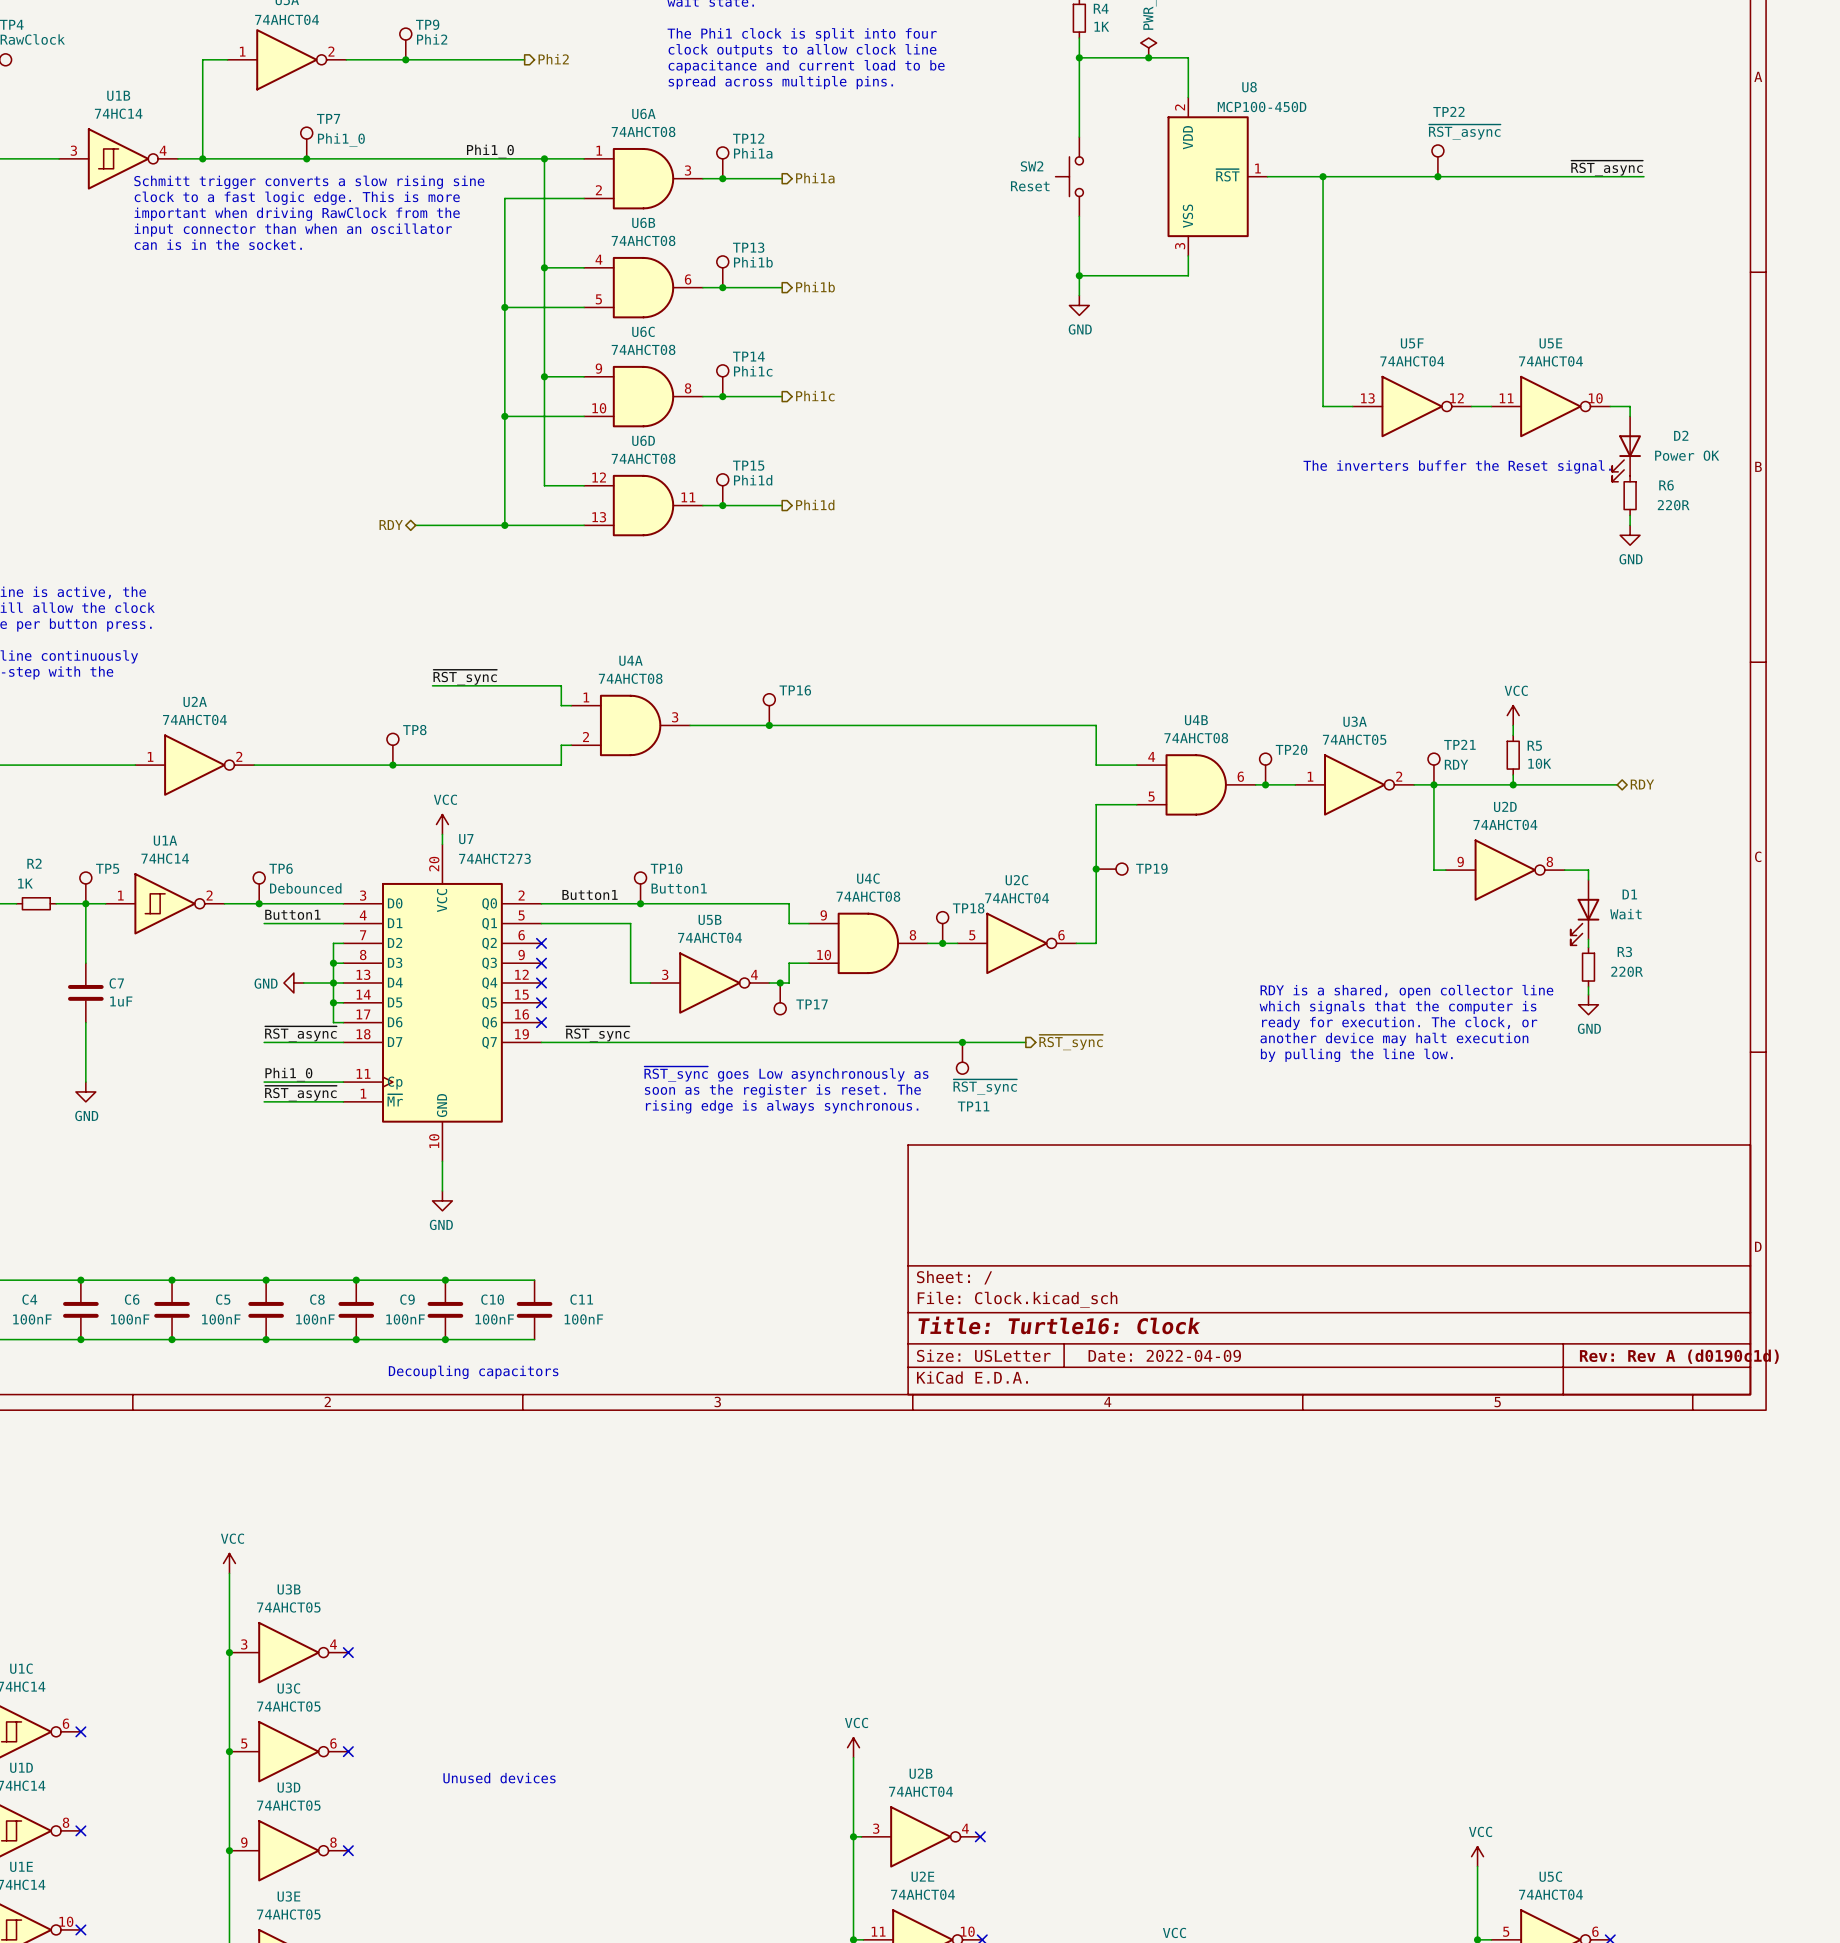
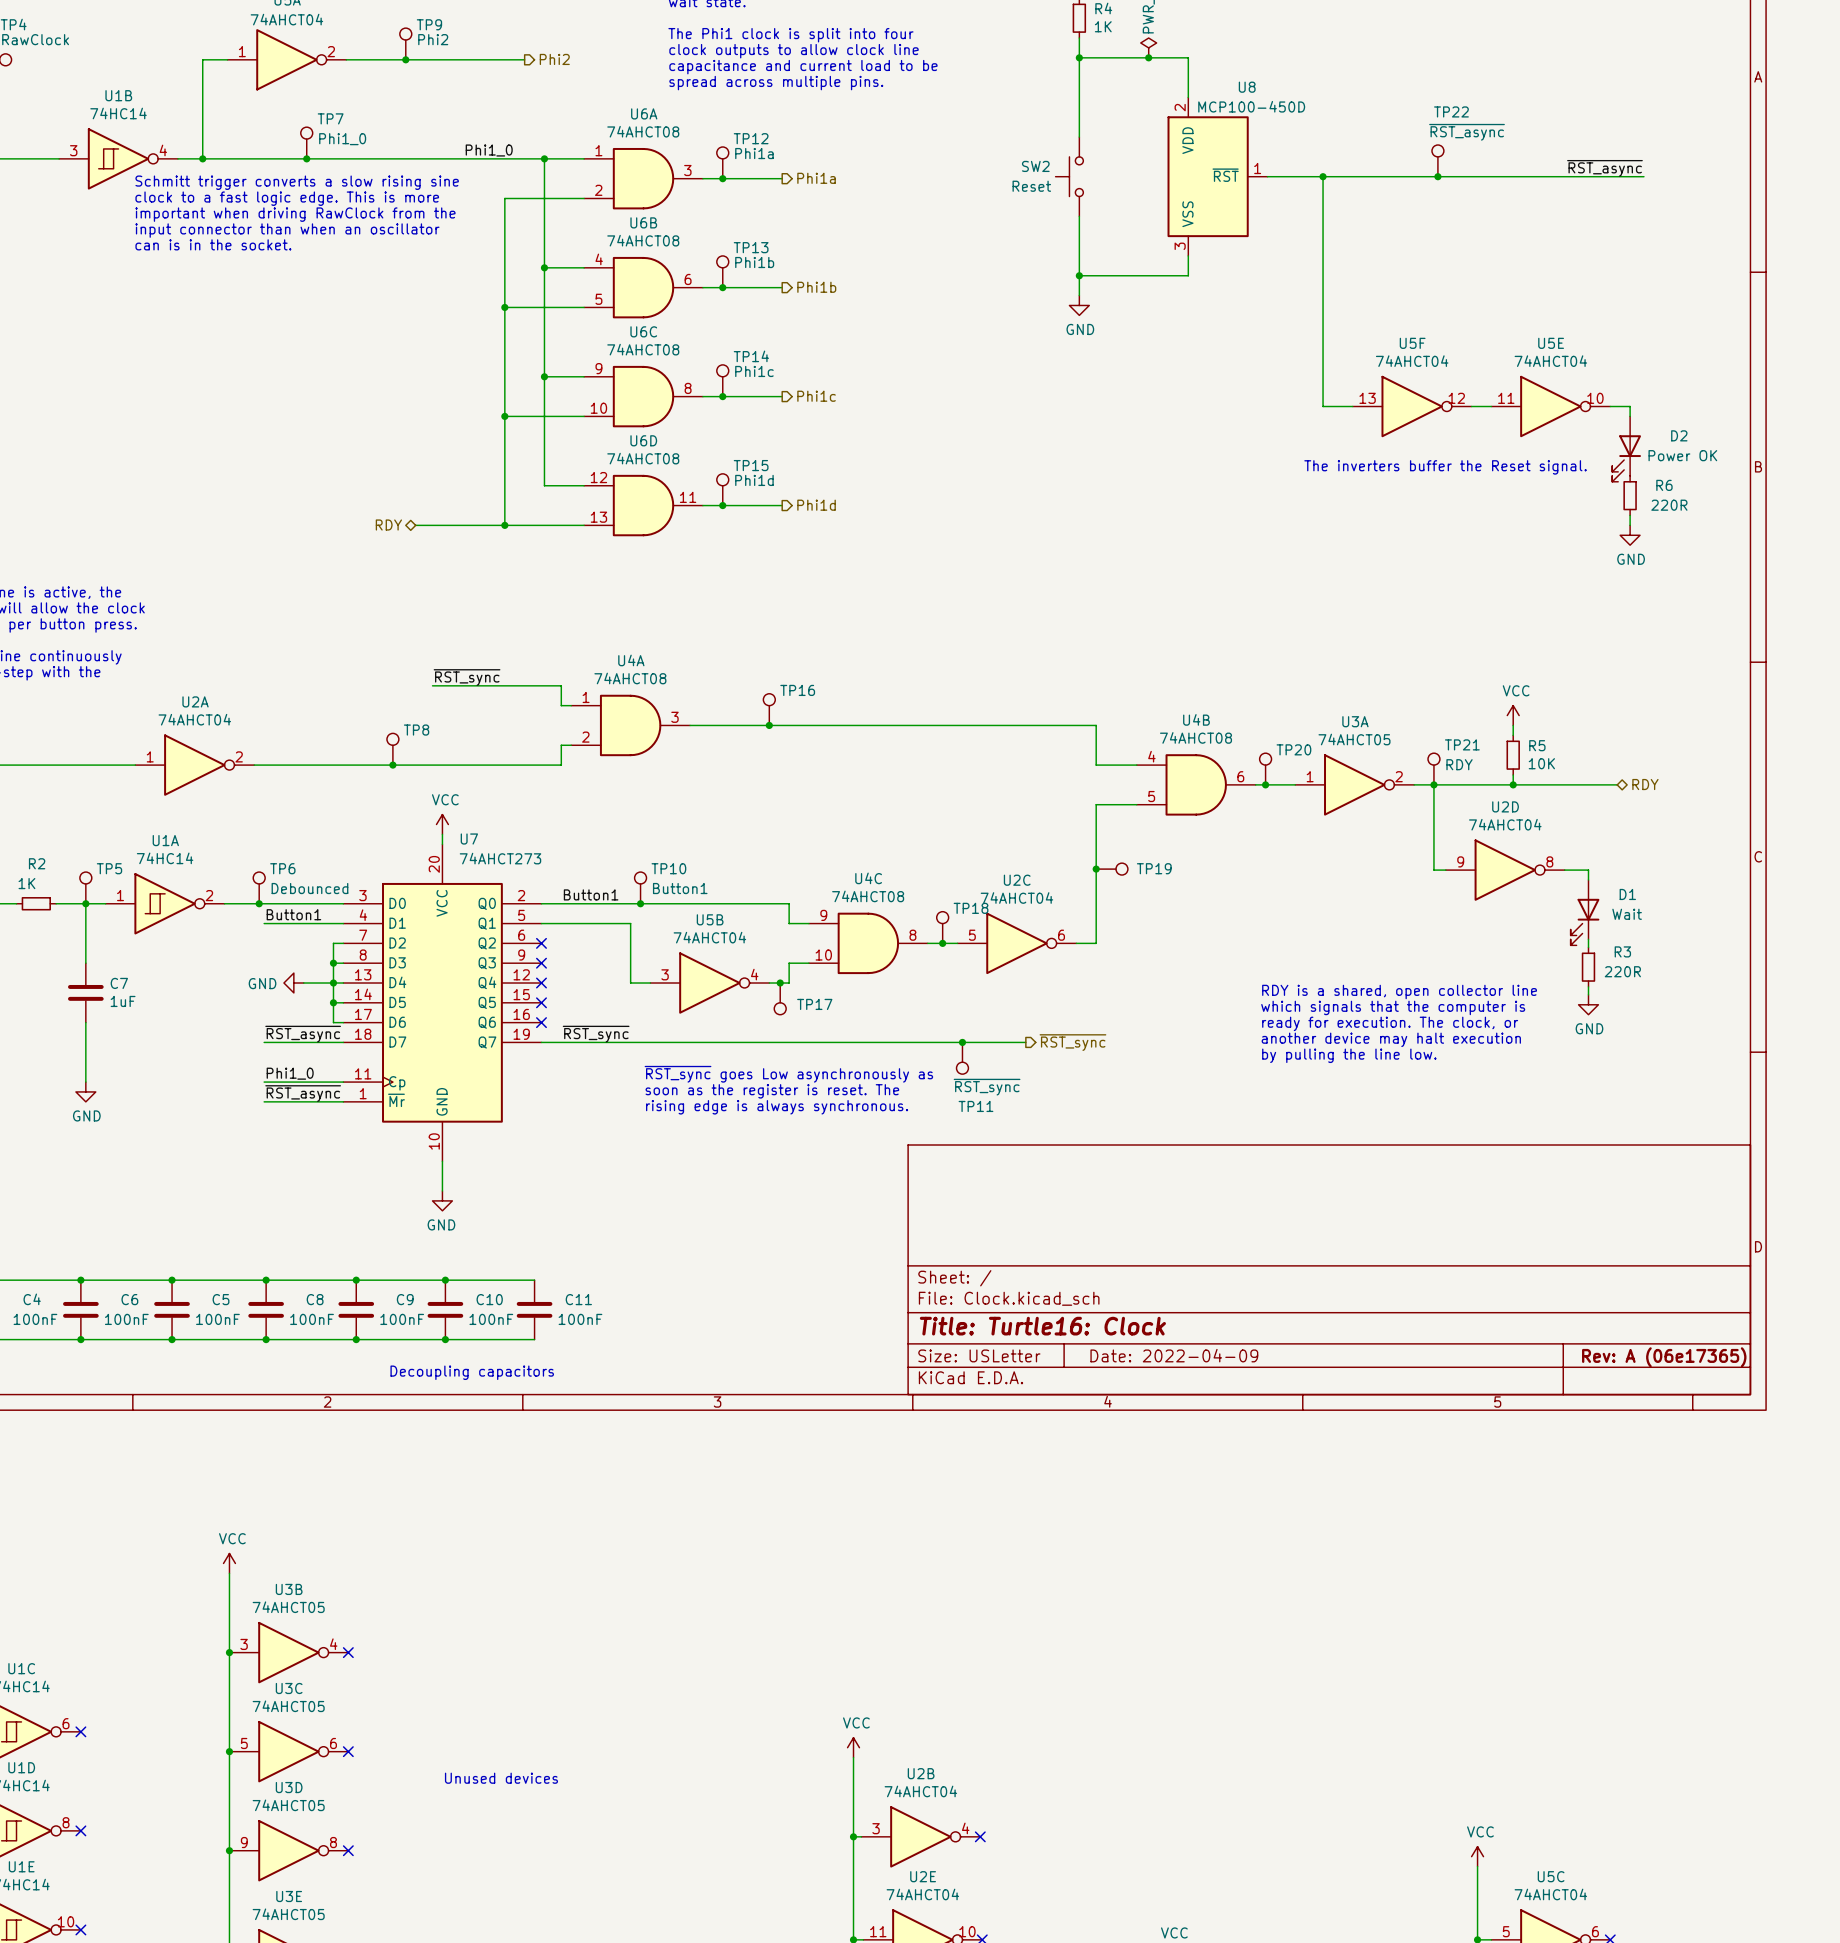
title block: Rev: Rev A (d0190c1d) (1679, 1356) -> Rev: A (06e17365) (1664, 1357)

